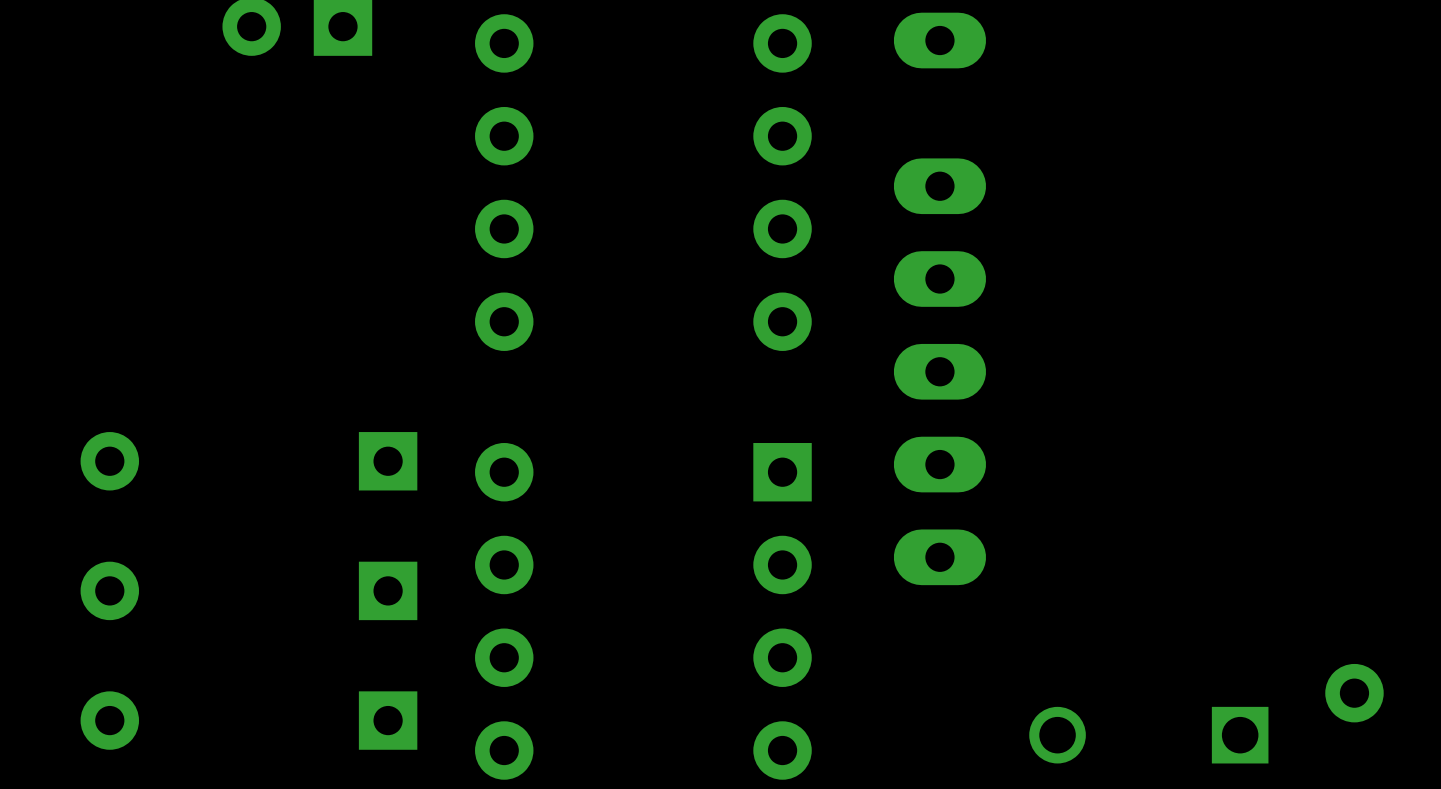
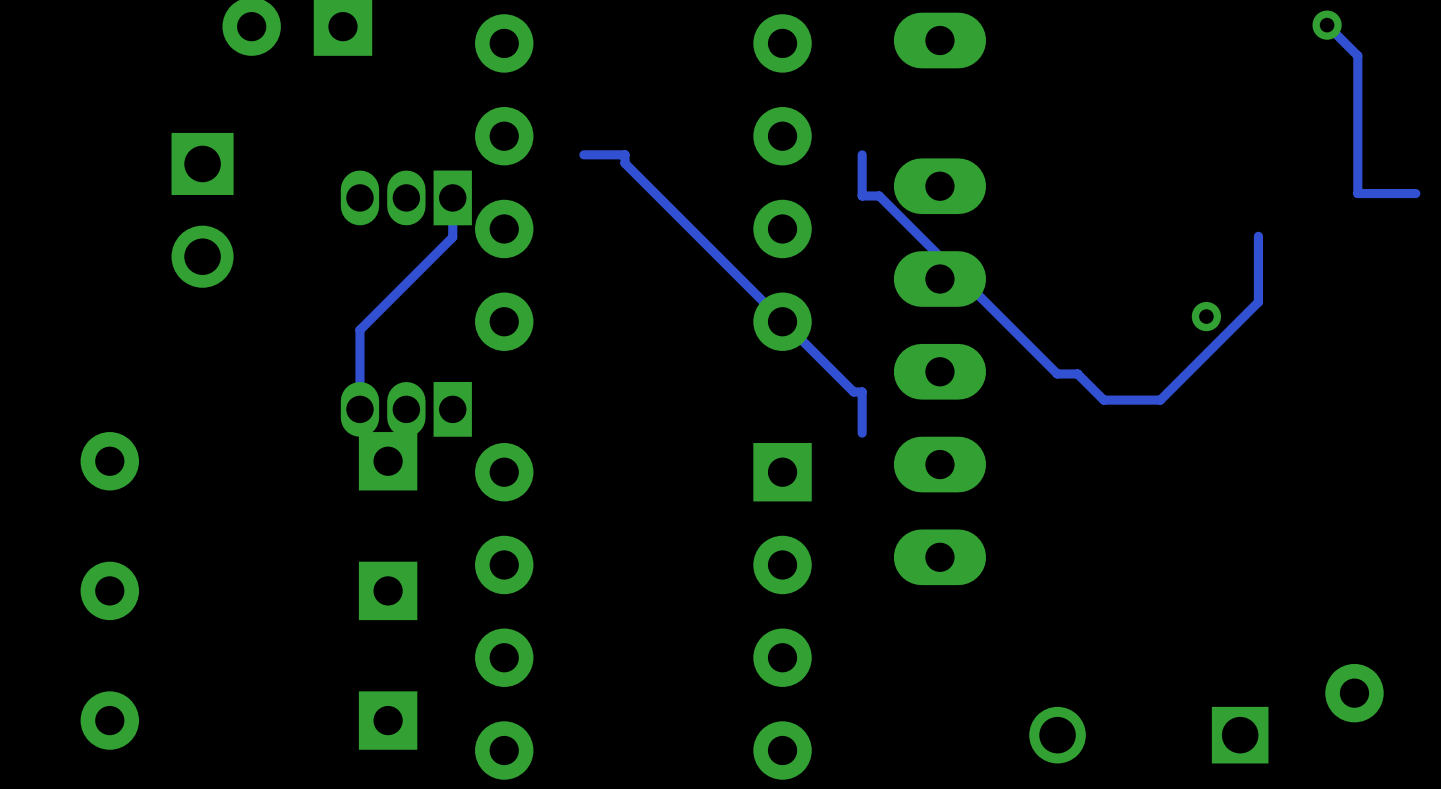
track: none -> (1327, 25) (1357, 55) (1357, 193) (1415, 193)
via: none -> (1327, 25)
track: none -> (583, 154) (625, 154) (625, 163) (853, 391) (862, 391) (862, 433)
track: none -> (862, 154) (862, 195) (879, 195) (1057, 373) (1077, 373) (1103, 400) (1160, 400) (1258, 302) (1258, 236)
part: none -> (406, 197)
track: none -> (452, 197) (452, 237) (359, 330) (359, 409)
part: none -> (202, 210)
via: none -> (1206, 316)
part: none -> (406, 409)

